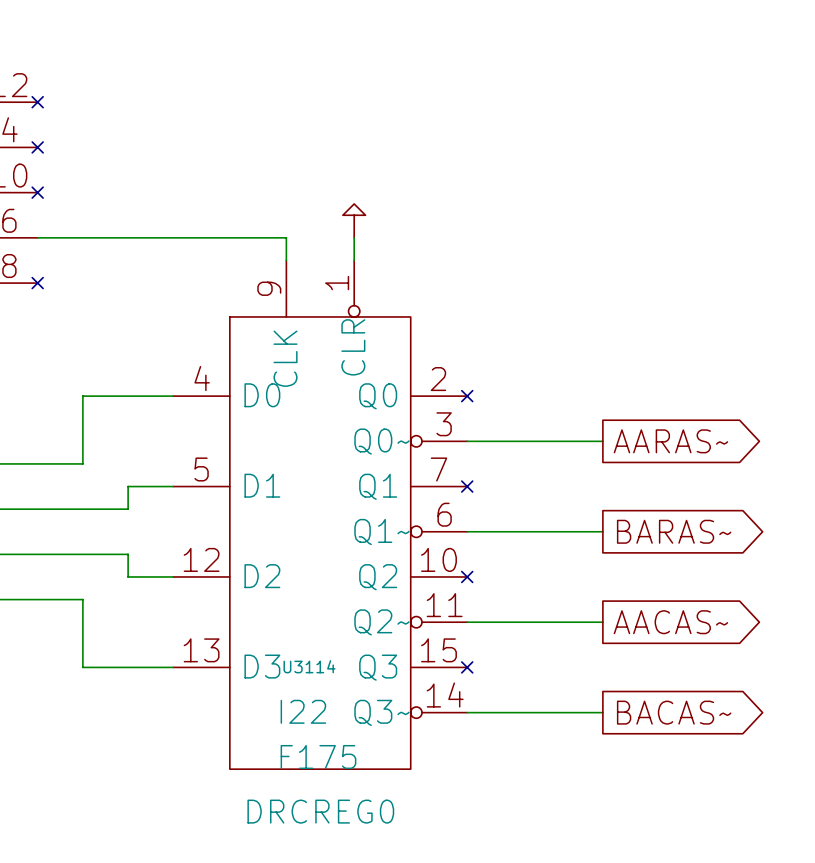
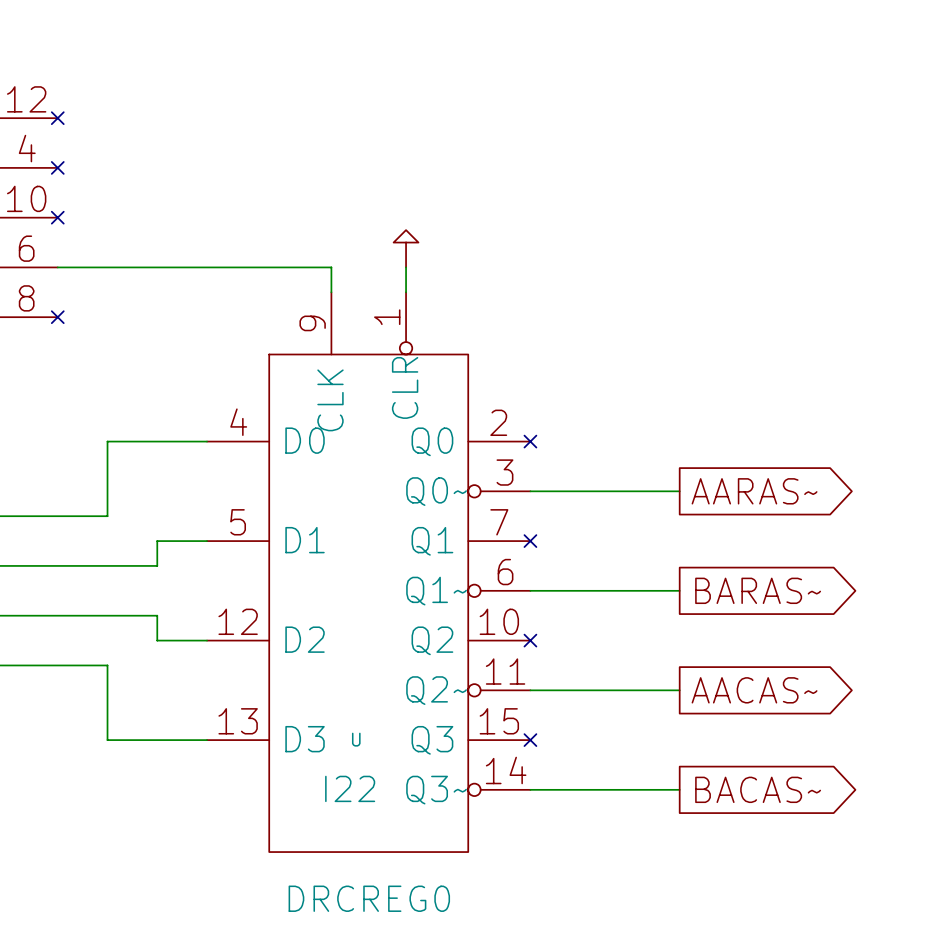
U3114 name: U3114 (309, 666) -> U (356, 739)
U3114 value: F175 (318, 757) -> none

